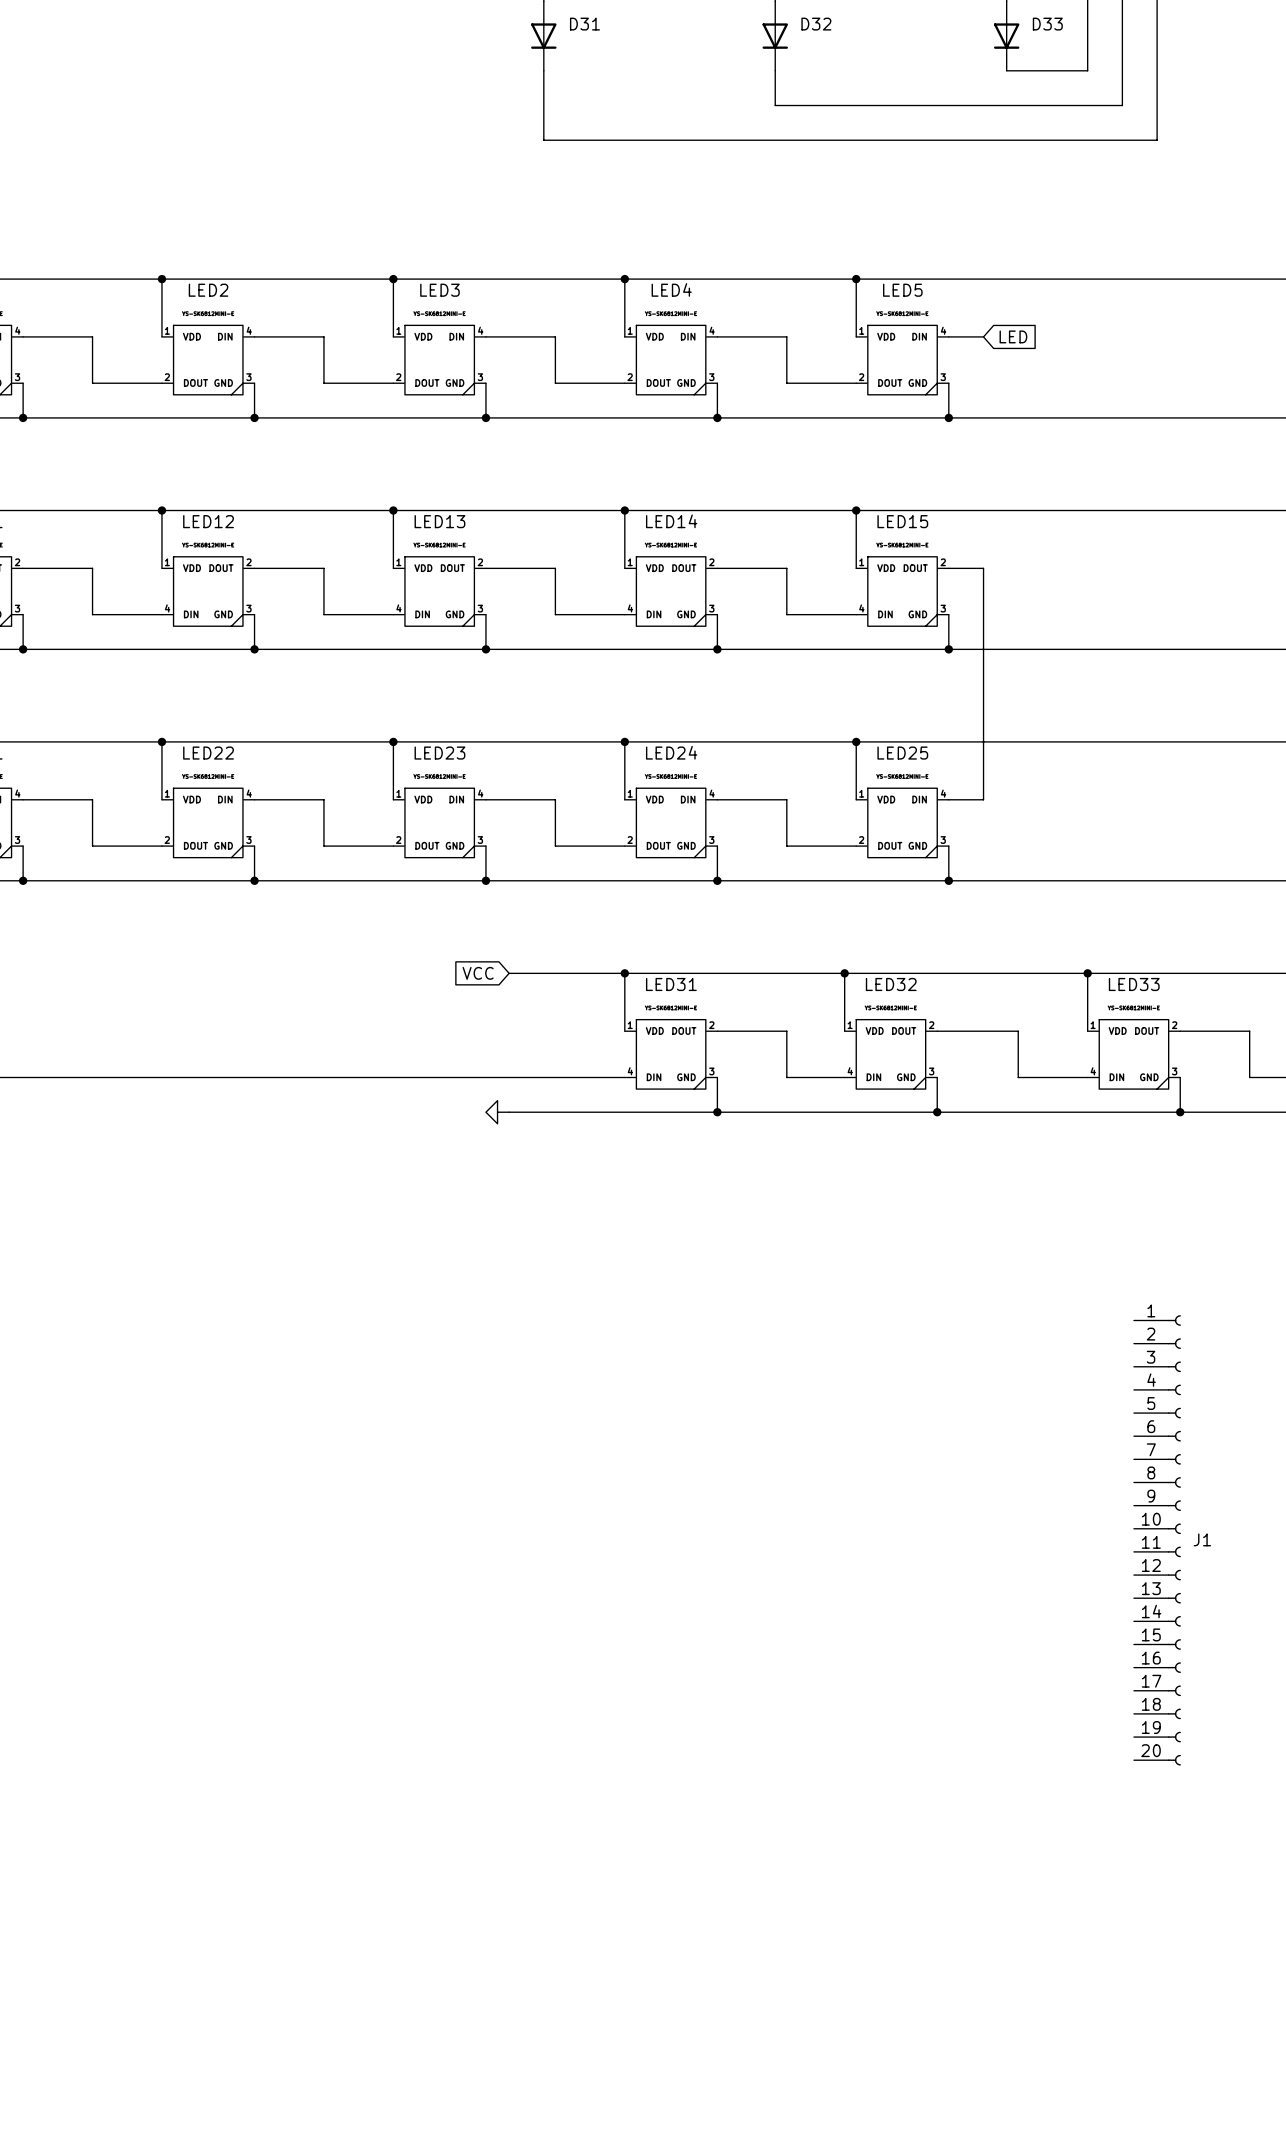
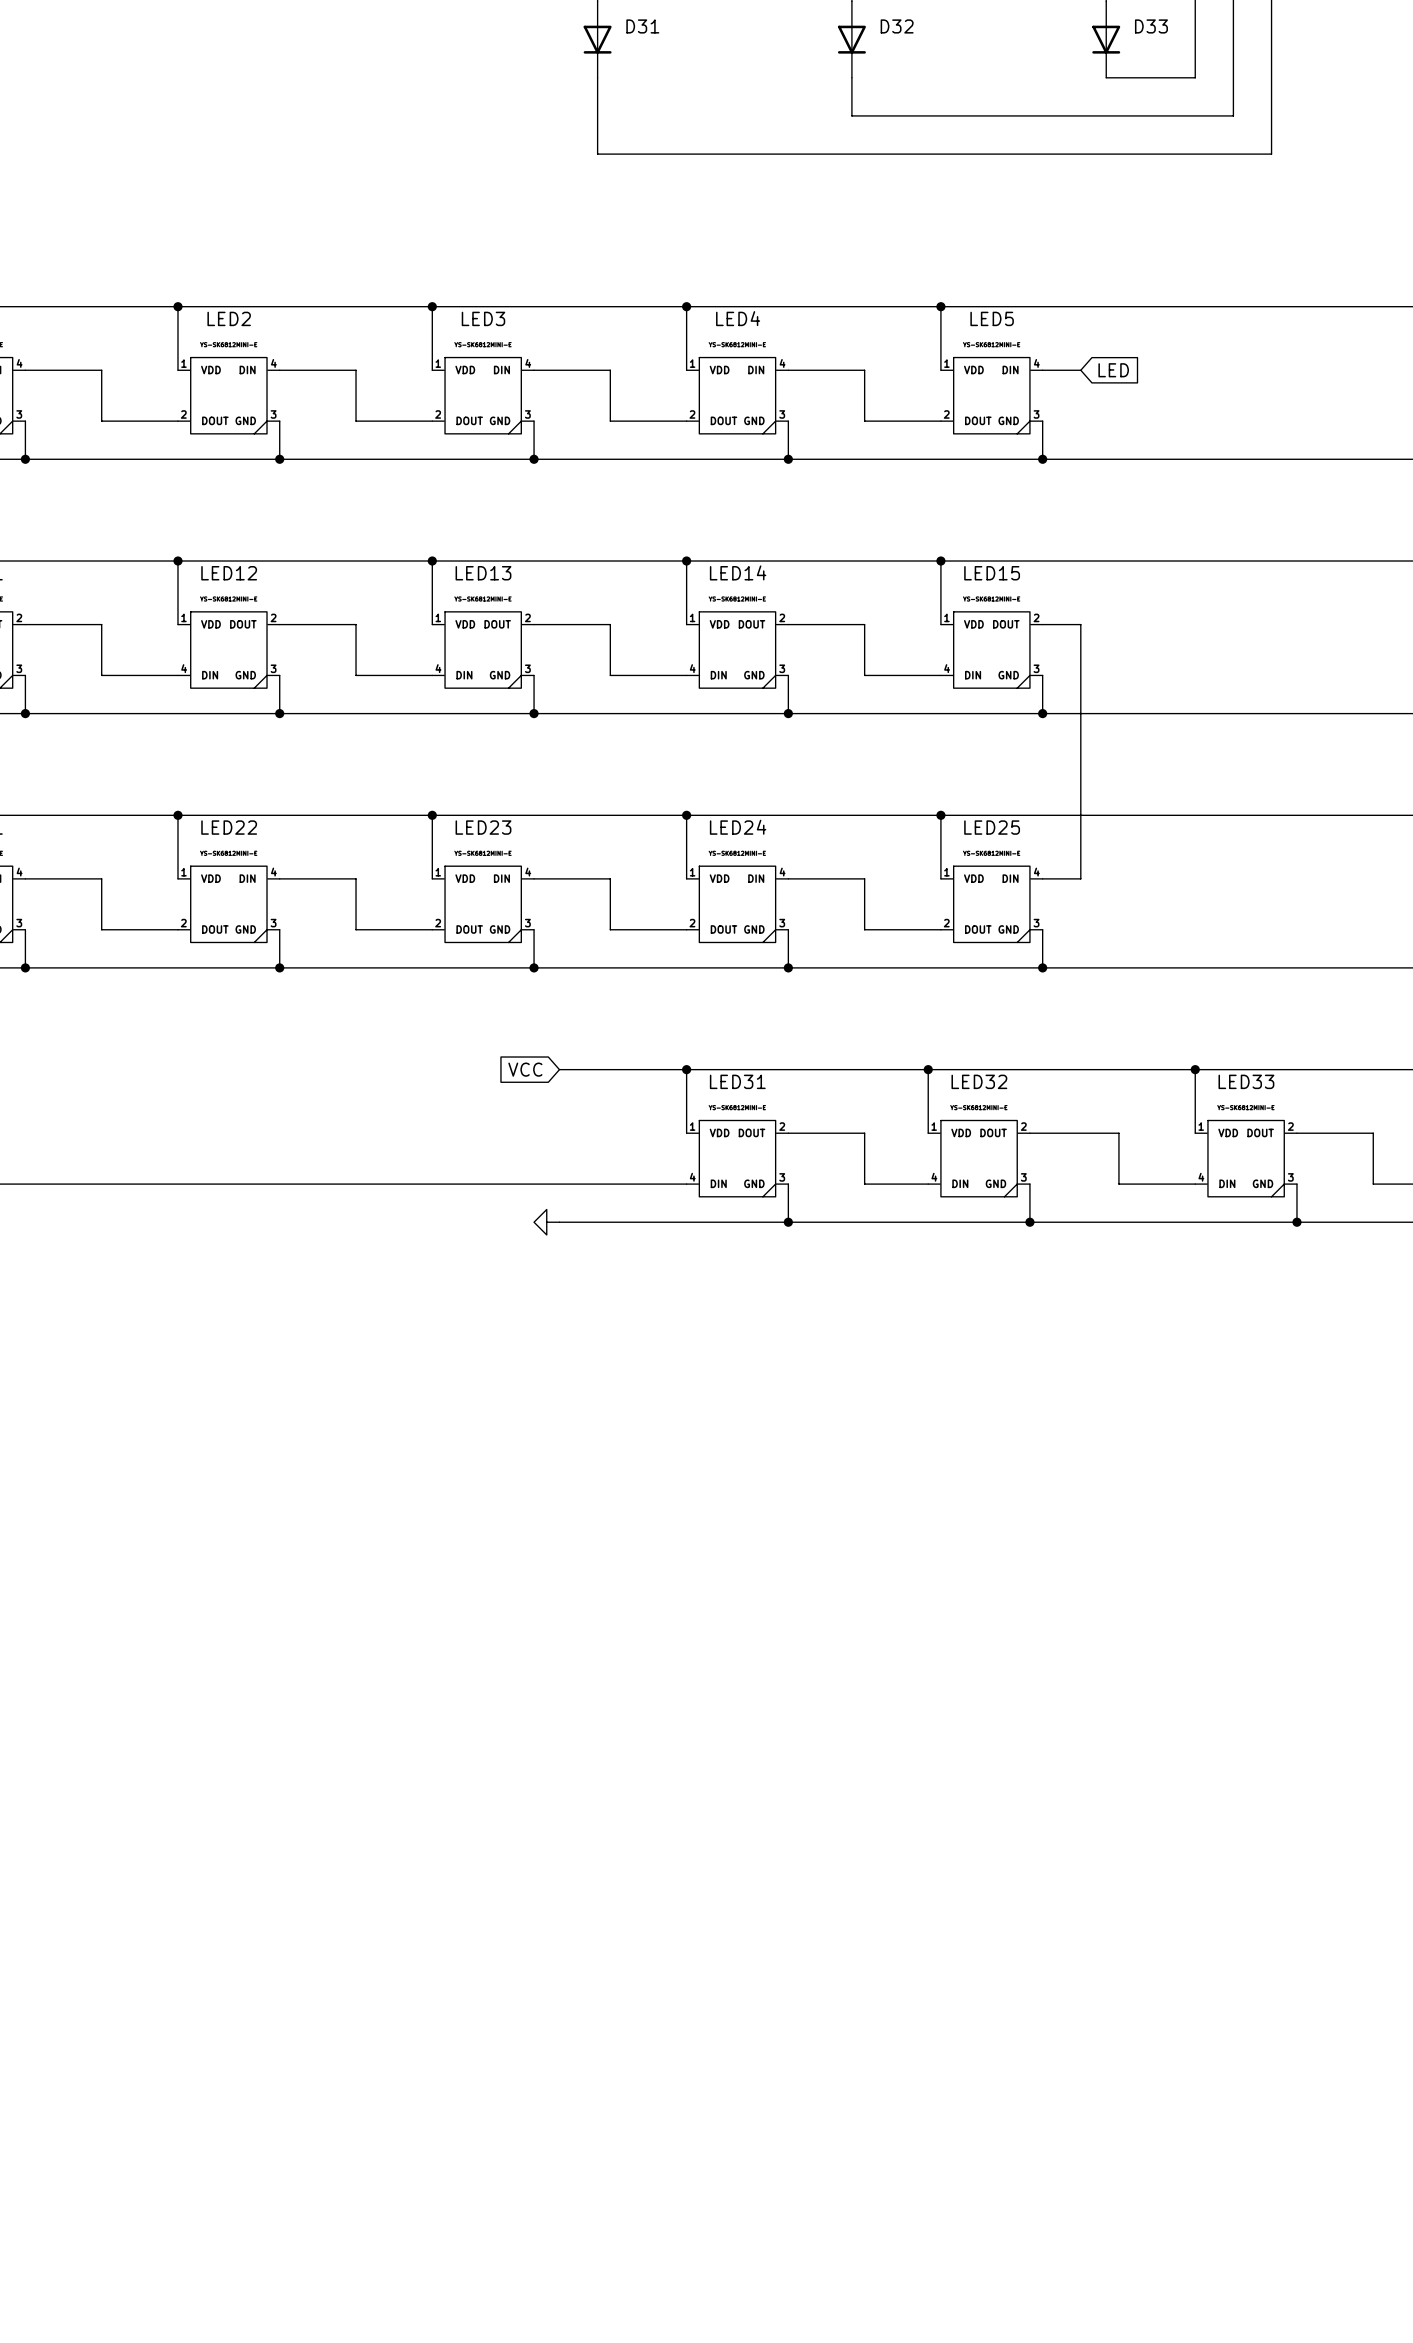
J1: (1157, 1540) -> none

